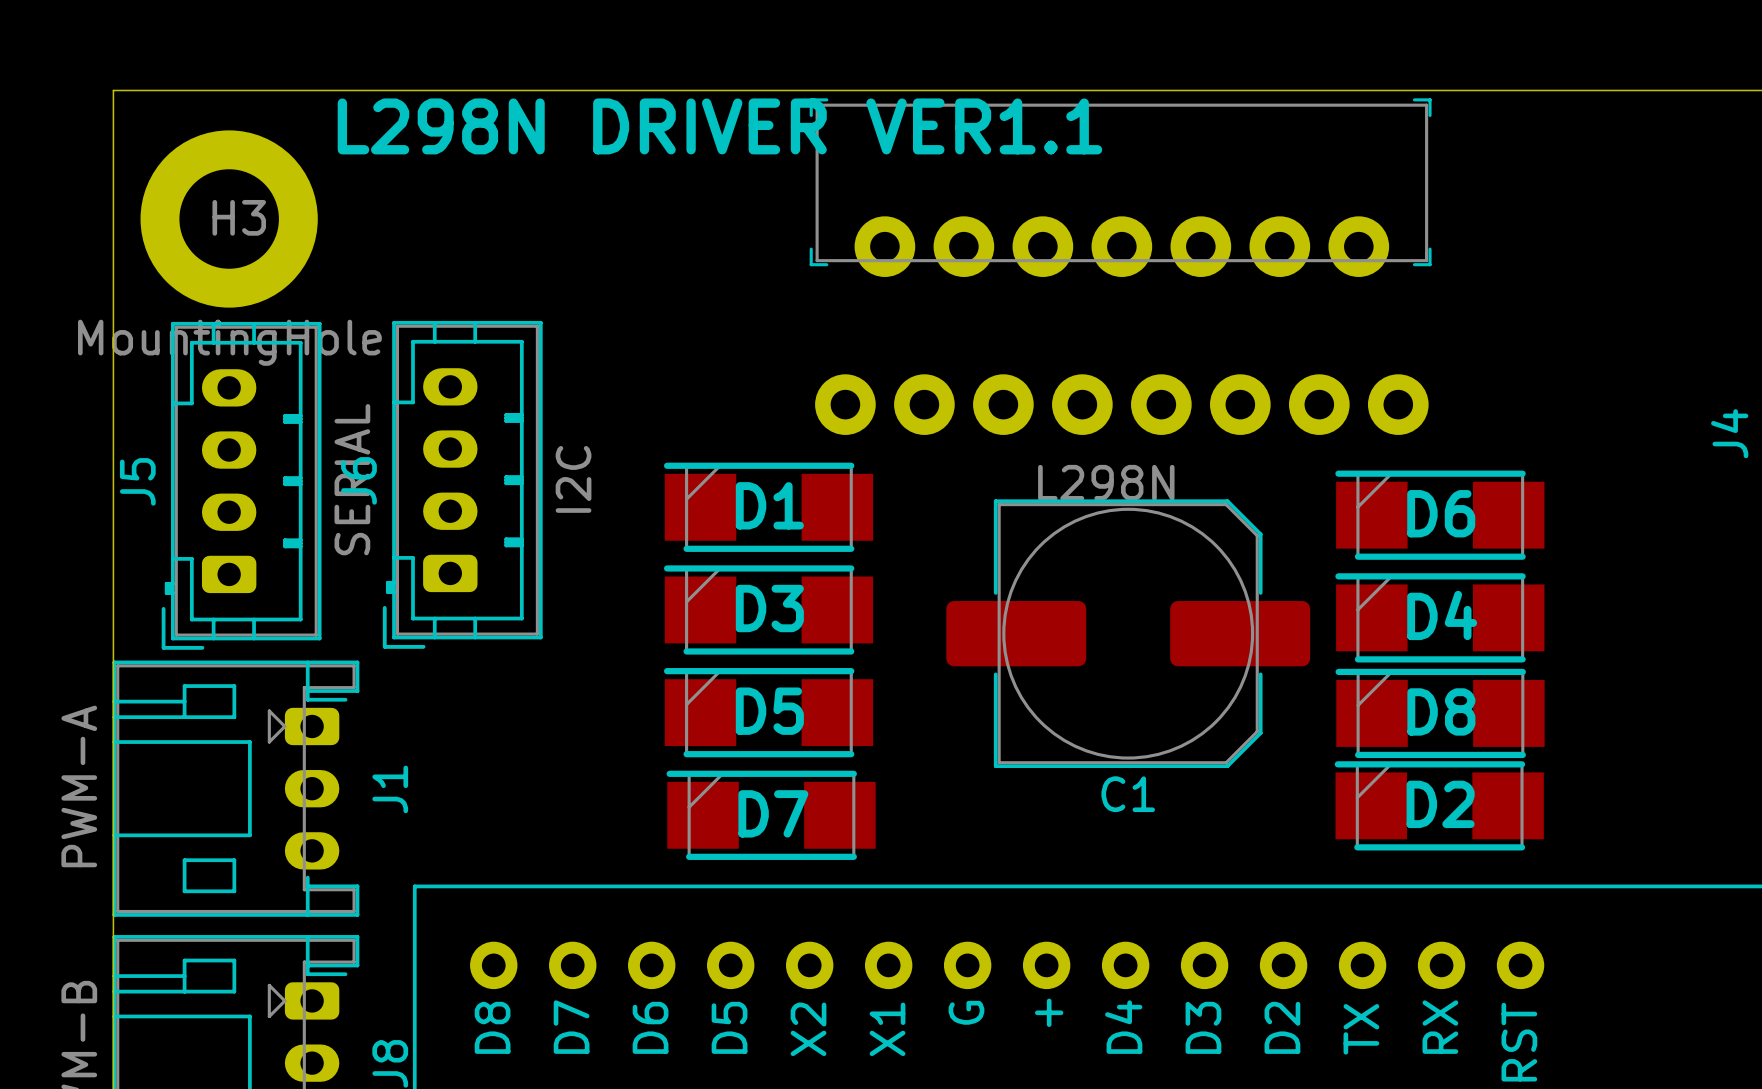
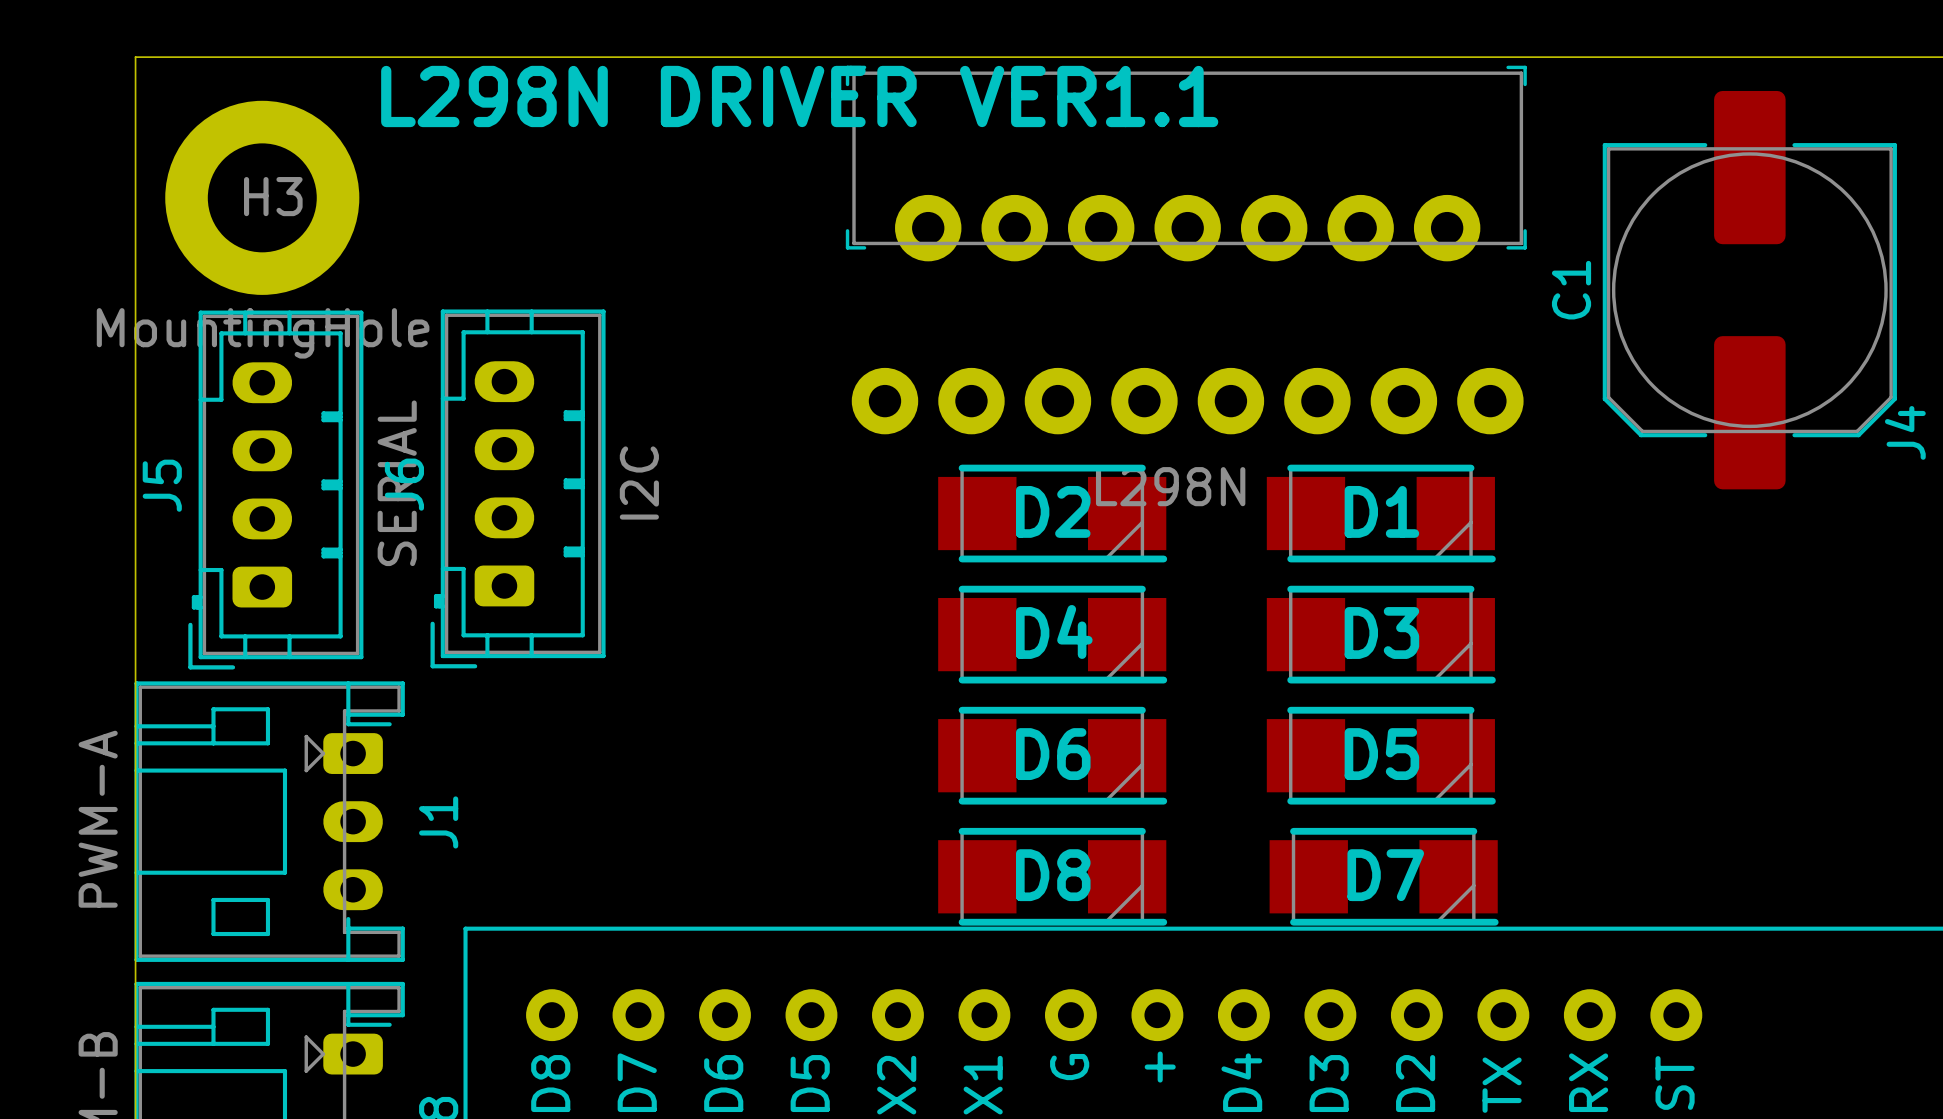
part position: (1120, 266) -> (1186, 250)
D1 rotation: 0° (768, 507) -> 180° (1381, 513)
D1 position: (768, 507) -> (1381, 513)
D6 rotation: 0° (1439, 515) -> 180° (1052, 755)
D6 position: (1439, 515) -> (1052, 755)
D3 rotation: 0° (768, 609) -> 180° (1381, 634)
D3 position: (768, 609) -> (1381, 634)
D4 rotation: 0° (1439, 617) -> 180° (1052, 634)
D4 position: (1439, 617) -> (1052, 634)
C1 rotation: 0° (1128, 633) -> 90° clockwise (1749, 290)
C1 position: (1128, 633) -> (1749, 290)
D5 rotation: 0° (768, 712) -> 180° (1381, 755)
D5 position: (768, 712) -> (1381, 755)
D8 rotation: 0° (1440, 713) -> 180° (1052, 876)
D8 position: (1440, 713) -> (1052, 876)
D2 rotation: 0° (1439, 805) -> 180° (1052, 513)
D2 position: (1439, 805) -> (1052, 513)
D7 rotation: 0° (771, 815) -> 180° (1384, 876)
D7 position: (771, 815) -> (1384, 876)

